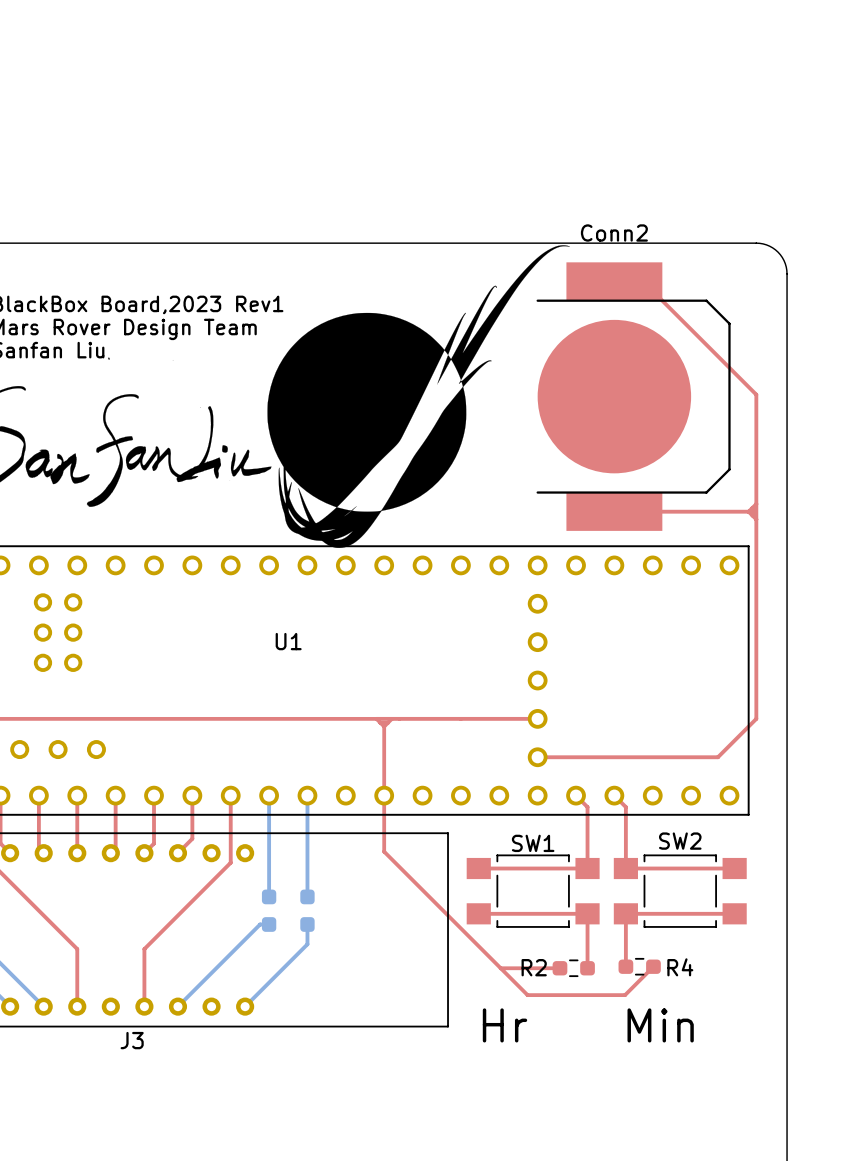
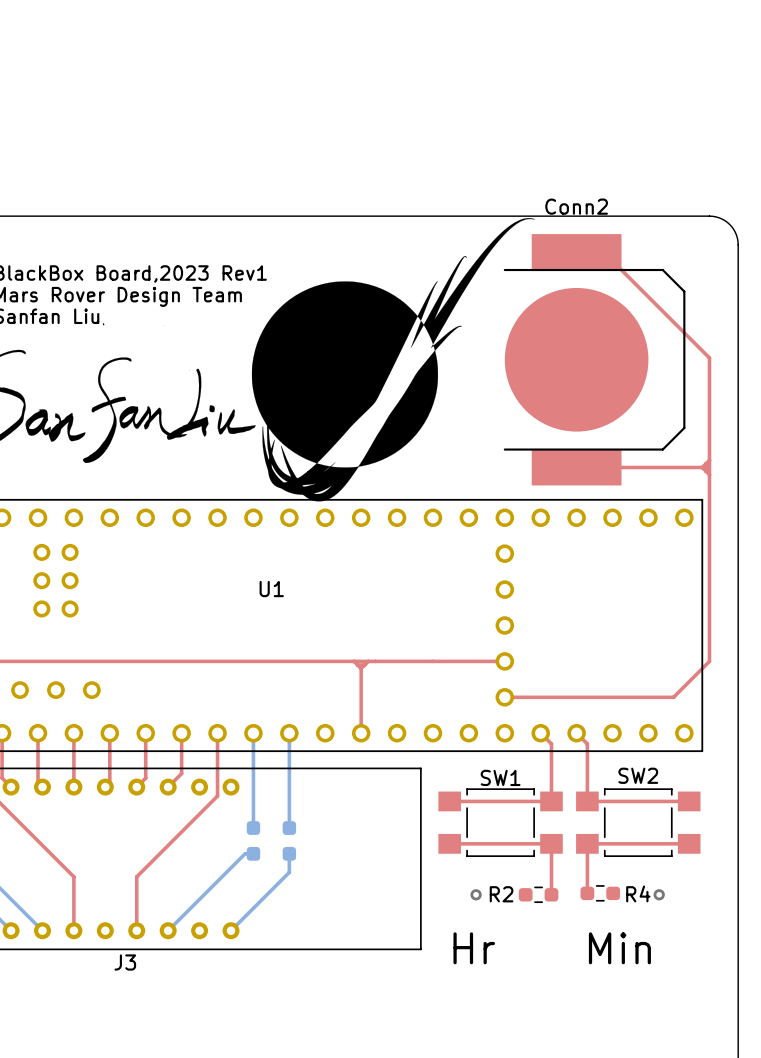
top track: (384, 795) (384, 851) (527, 995) (625, 995) (653, 966) -> none
top track: (500, 968) (559, 968) -> none
via: none -> (476, 894)
via: none -> (659, 894)

